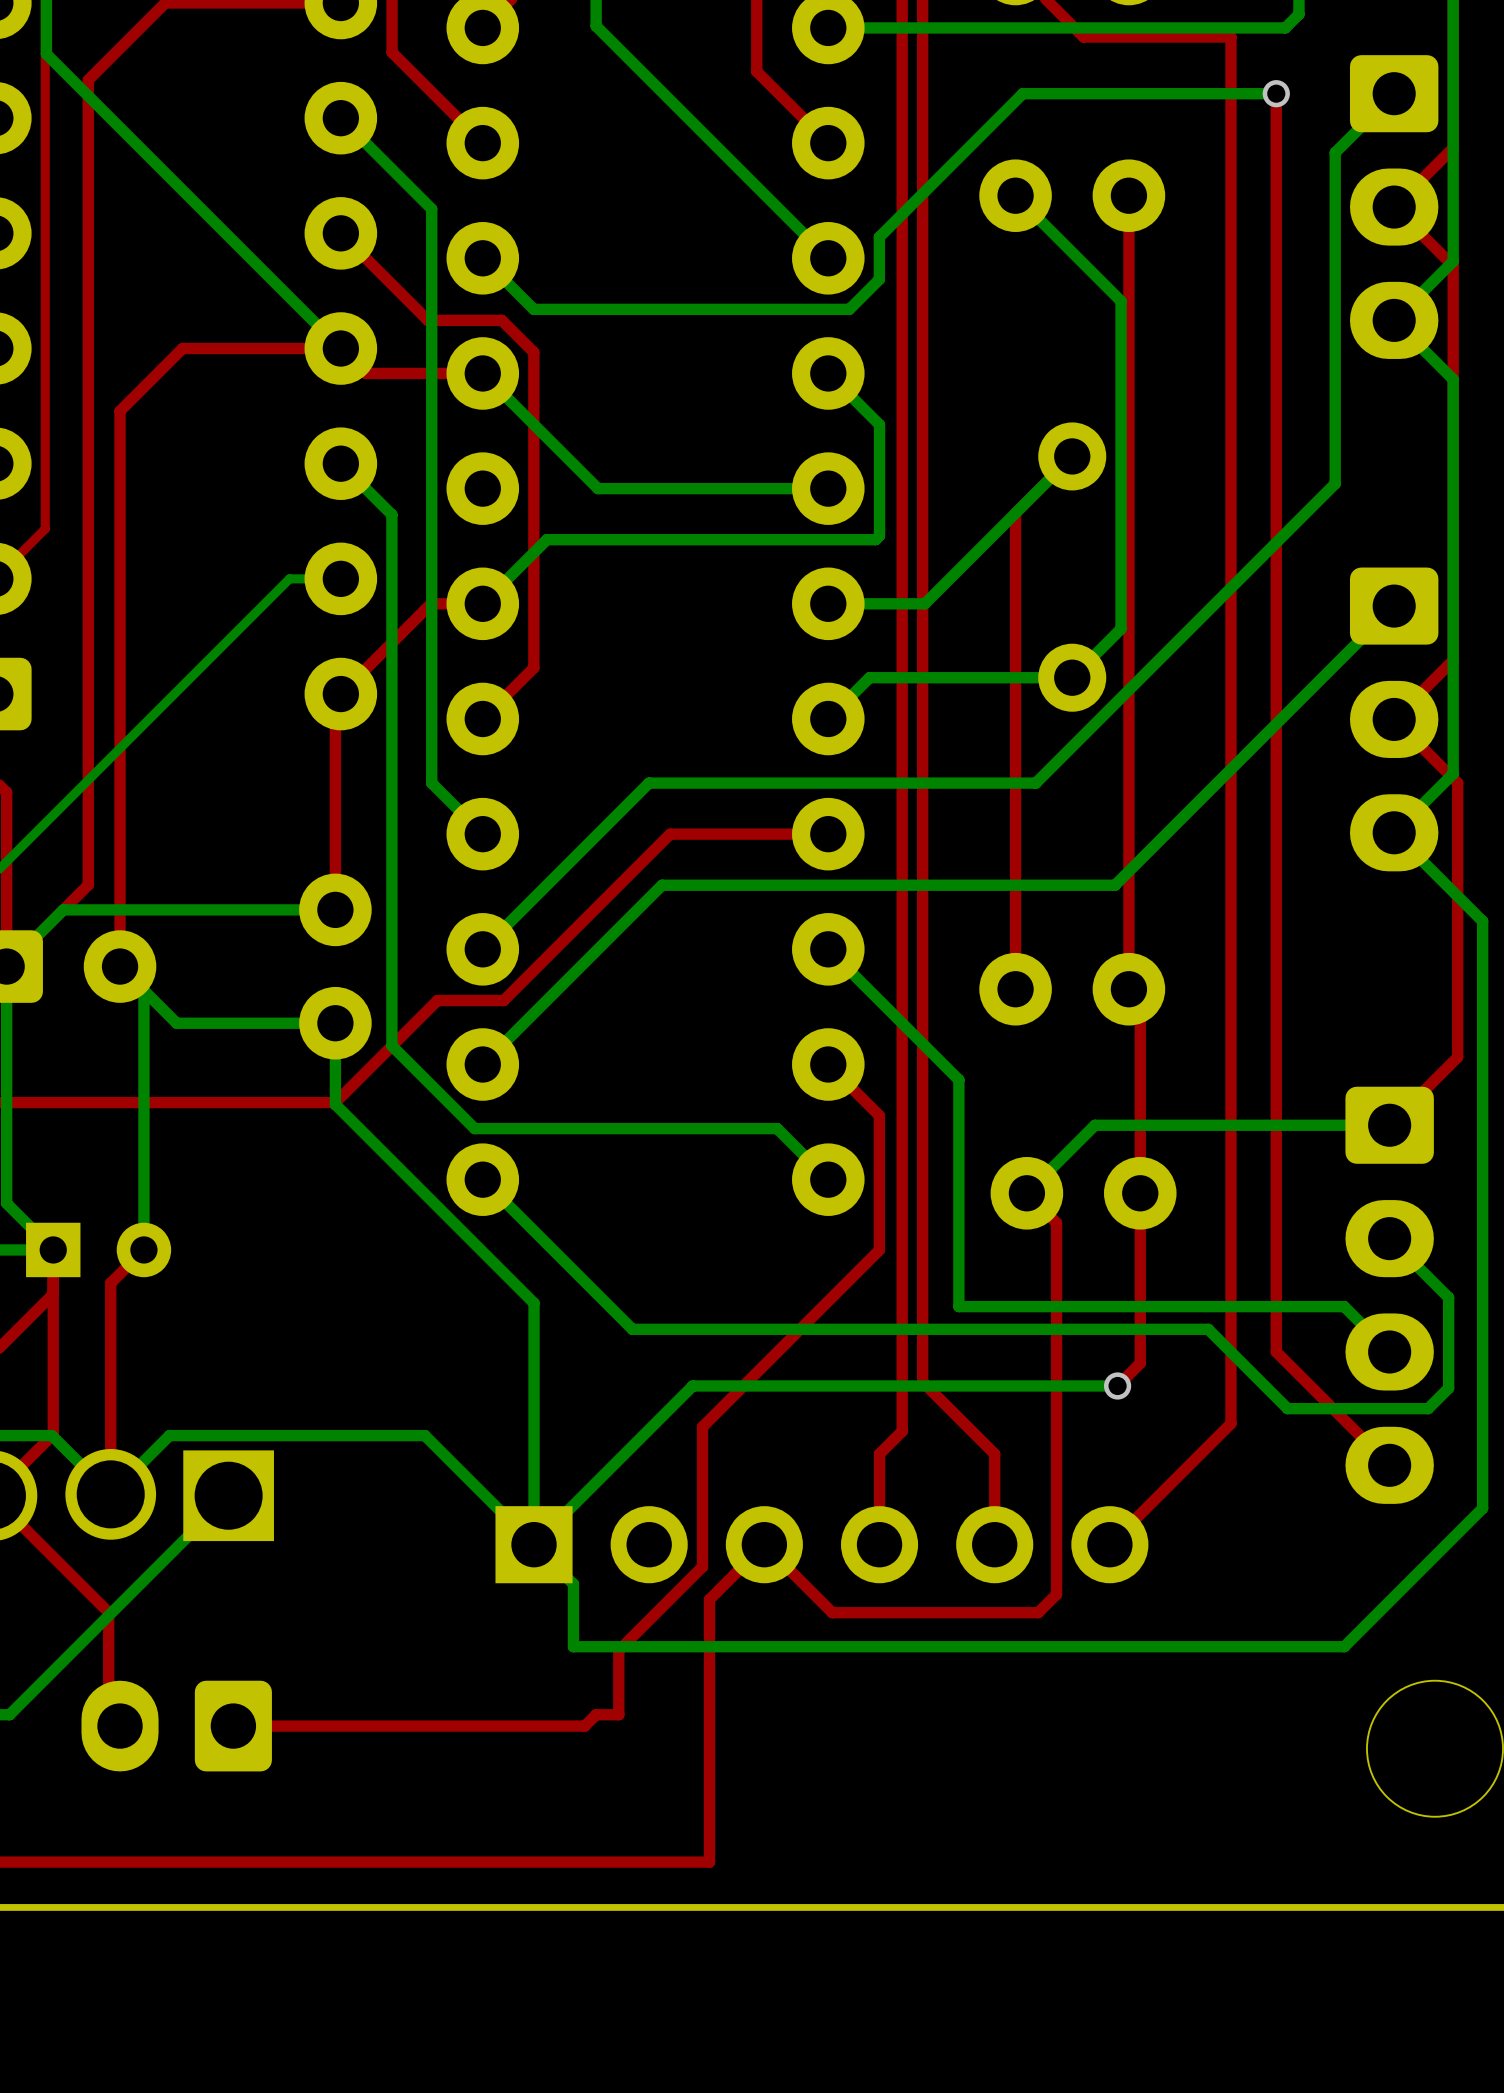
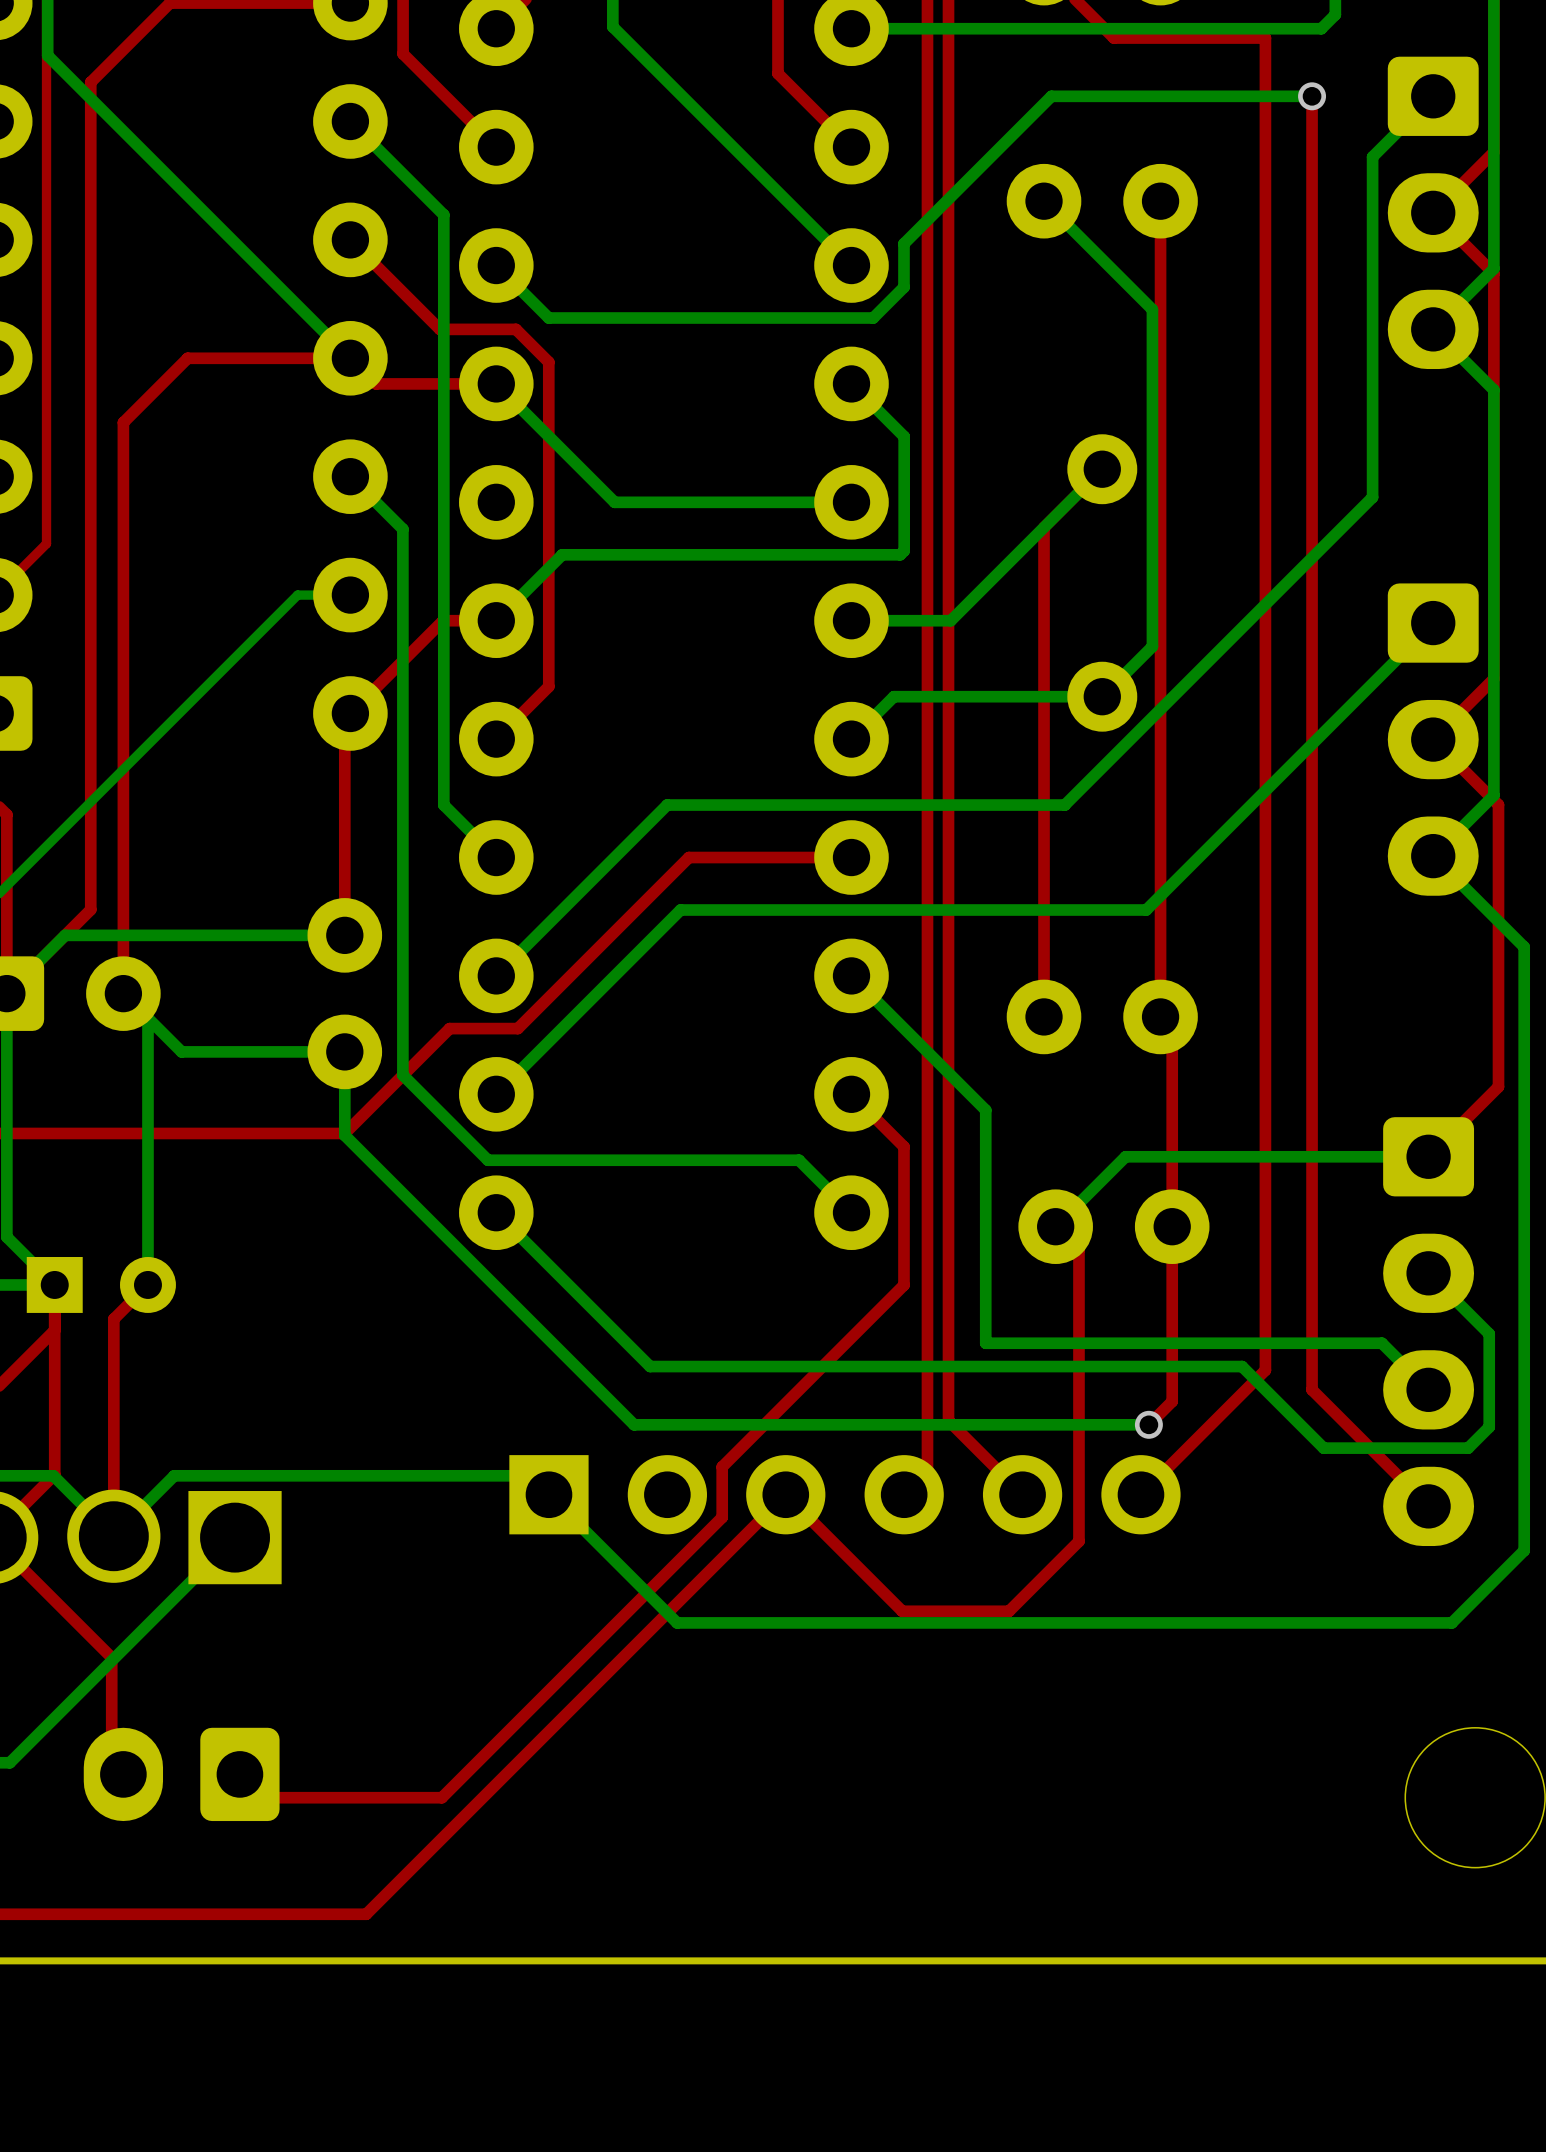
top track: (1049, 1215) (1056, 1222) (1056, 1594) (1038, 1612) (832, 1612) (764, 1544) (709, 1599) (709, 1862) (356, 1862) -> (1078, 1250) (1078, 1541) (1009, 1611) (902, 1611) (785, 1494) (366, 1914)
bottom track: (534, 1303) (534, 1544) (692, 1385) -> (548, 1339) (634, 1424) (712, 1424)
top track: (1230, 1332) (1230, 1423) (1109, 1544) -> (1265, 1370) (1140, 1494)
bottom track: (424, 1435) (573, 1584) (573, 1646) (1344, 1646) (1412, 1578) -> (436, 1475) (530, 1475) (677, 1622) (1451, 1622)
top track: (879, 1454) (879, 1544) -> none
top track: (994, 1454) (994, 1544) -> none
top track: (702, 1476) (702, 1566) (618, 1650) (618, 1714) (596, 1714) (584, 1726) (233, 1726) -> (722, 1517) (441, 1797) (228, 1797)
part position: (821, 1544) -> (844, 1494)

